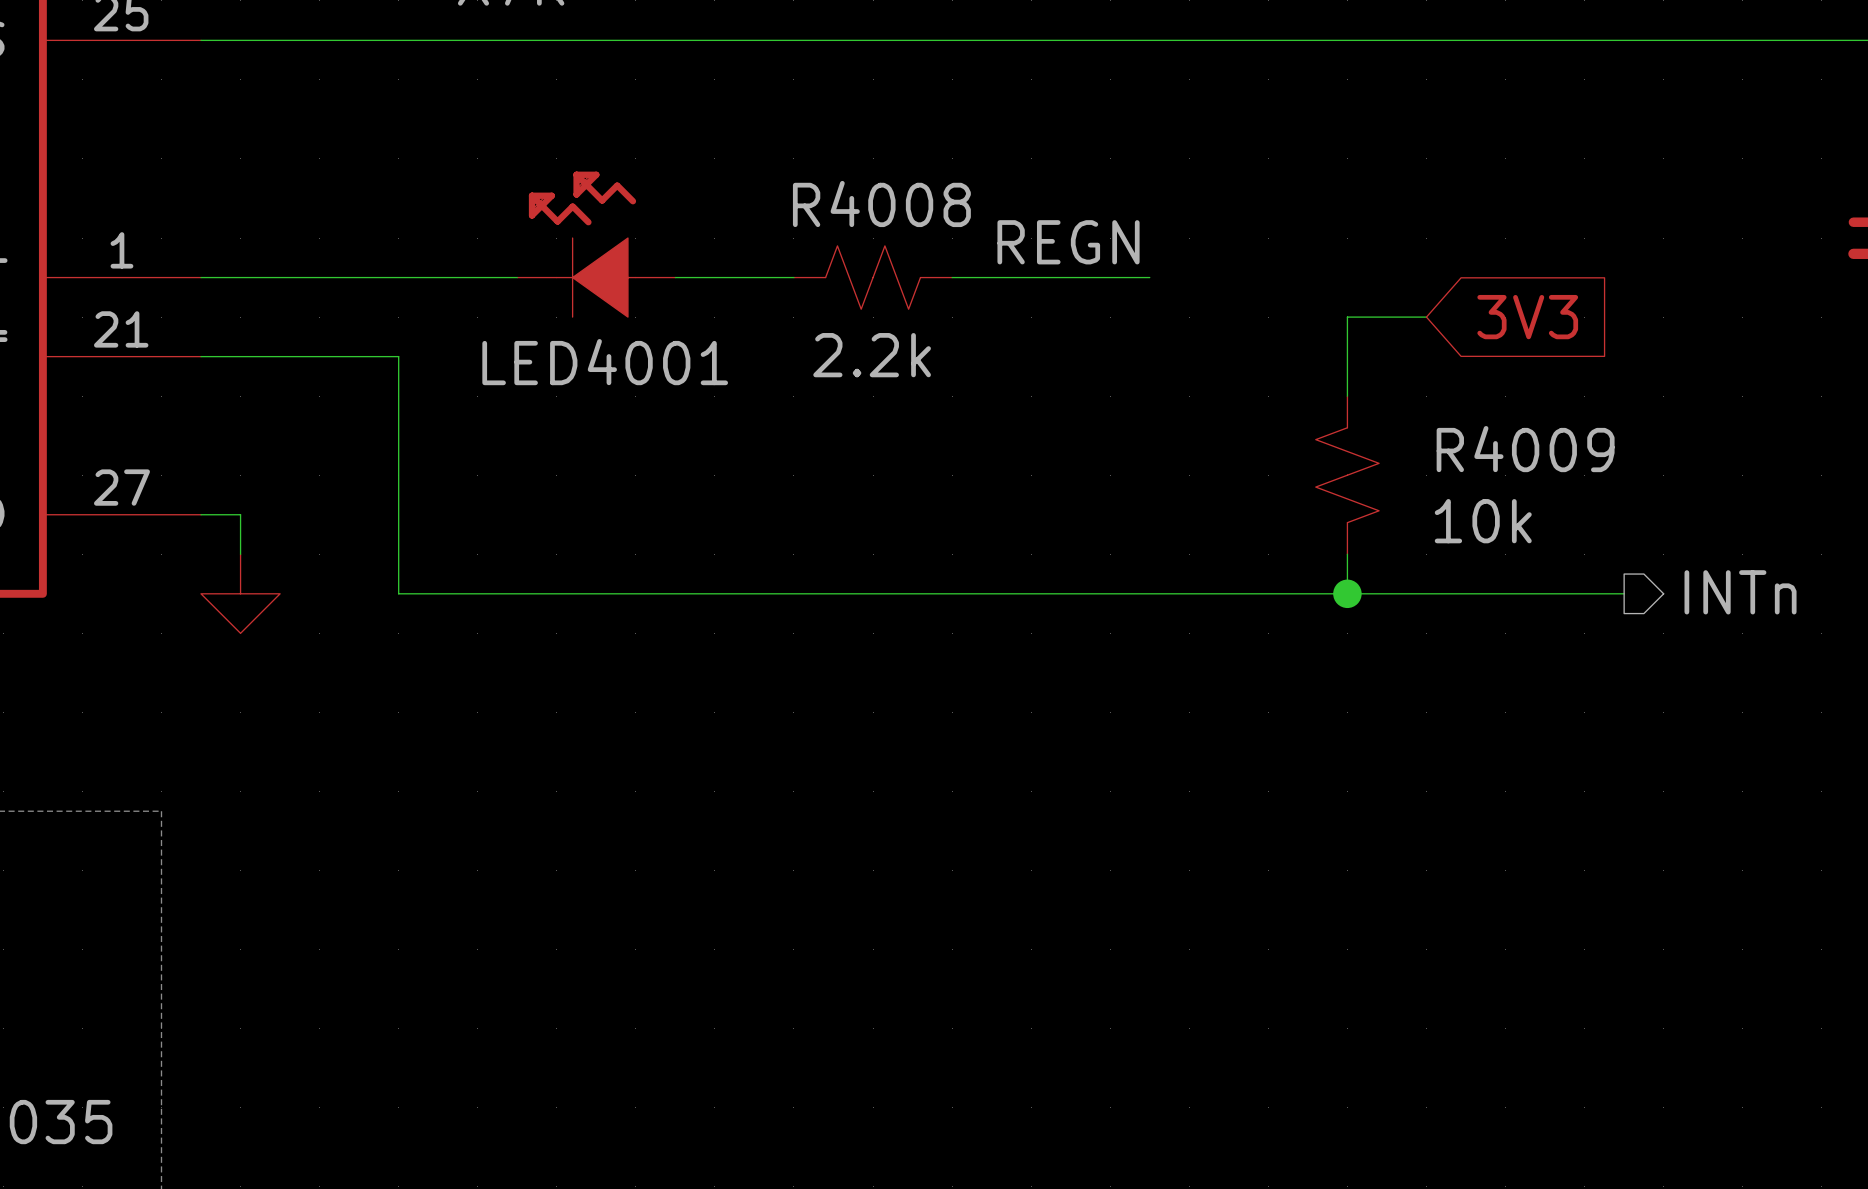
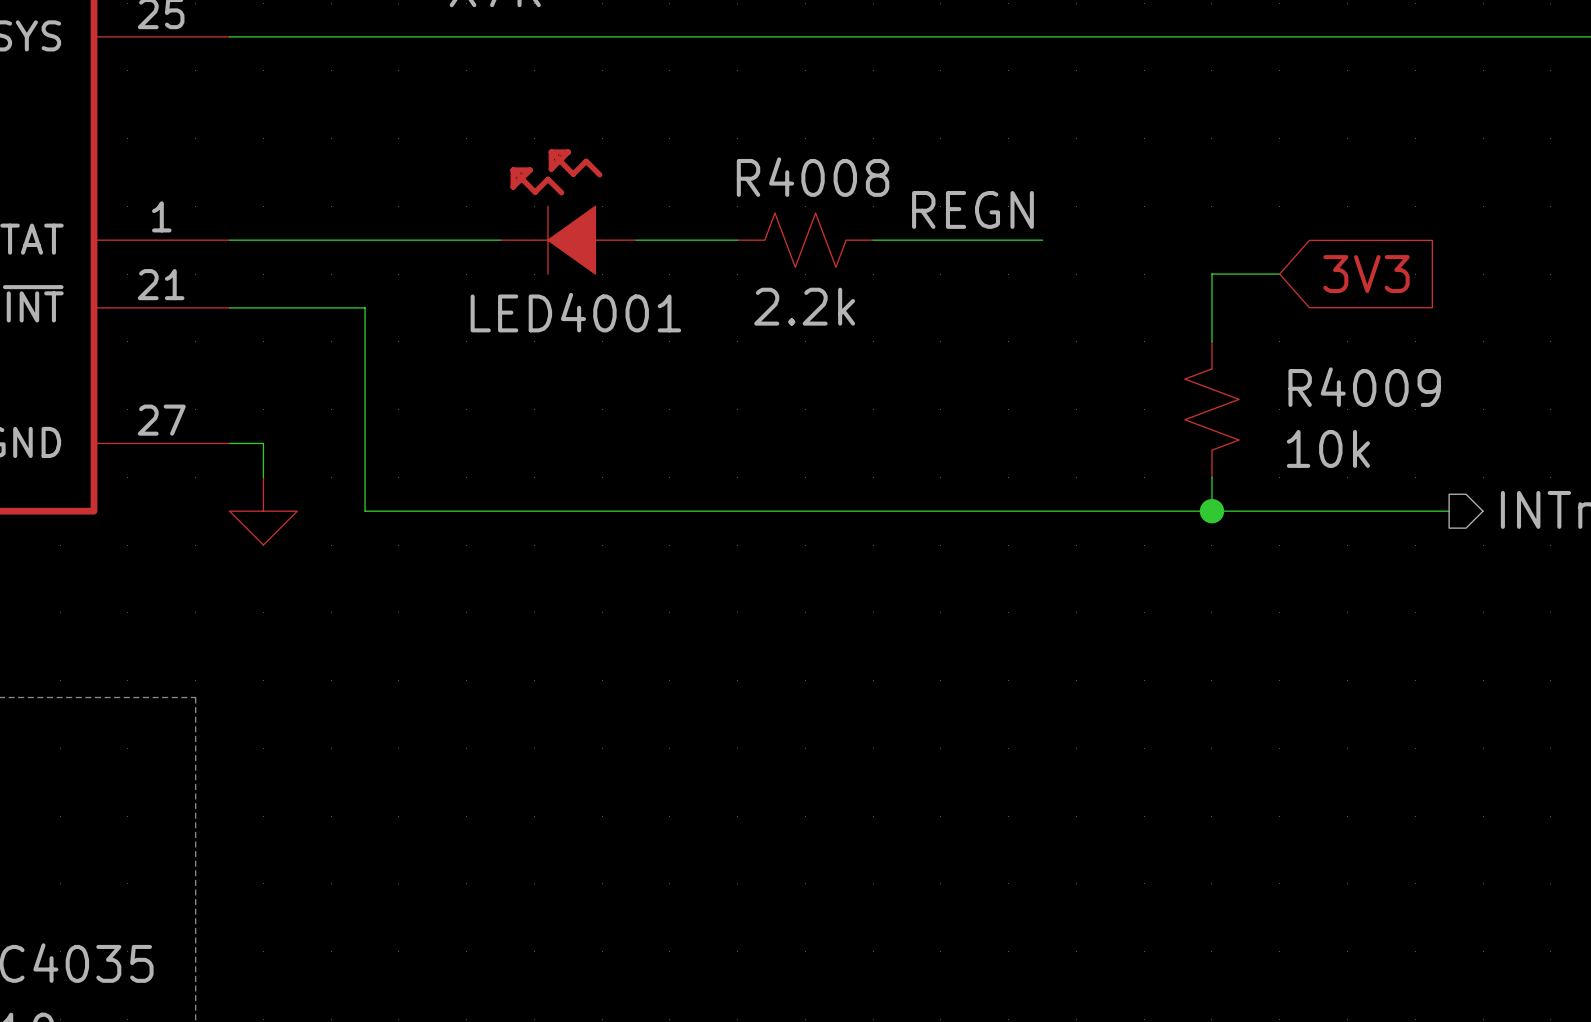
wire: (359, 356) (398, 356) (398, 593) -> (365, 307) (365, 511) (398, 511)

